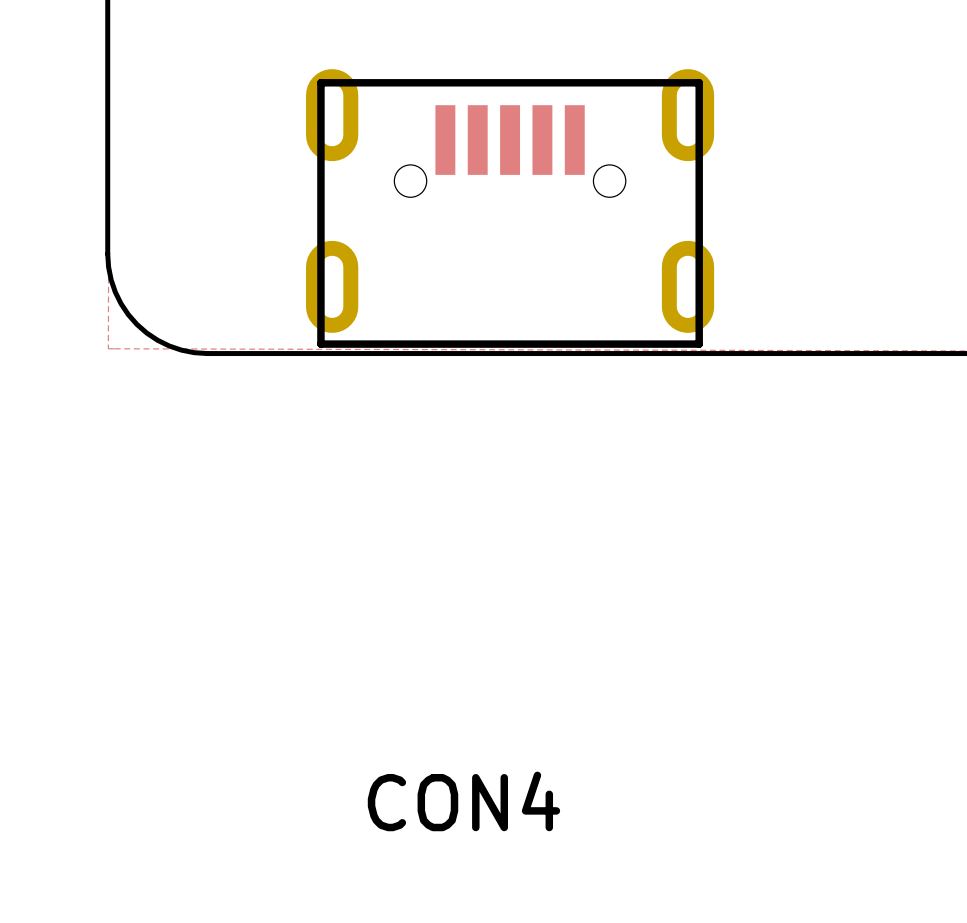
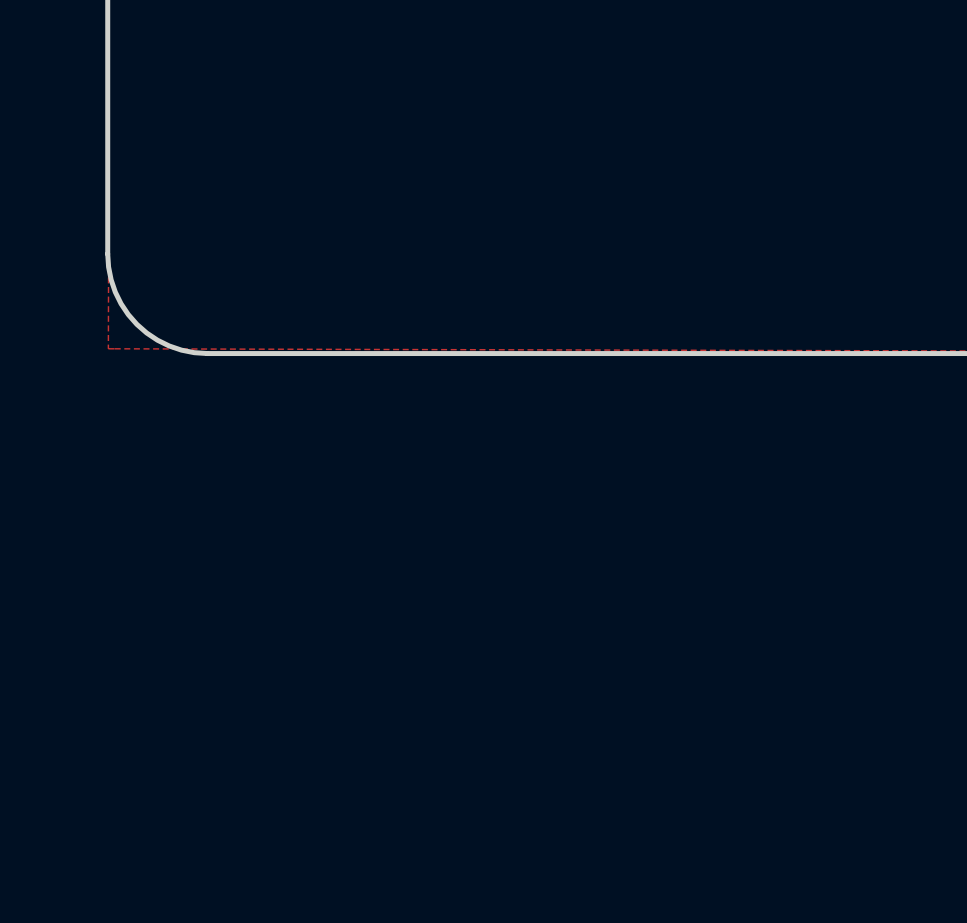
CON4: (510, 208) -> none

